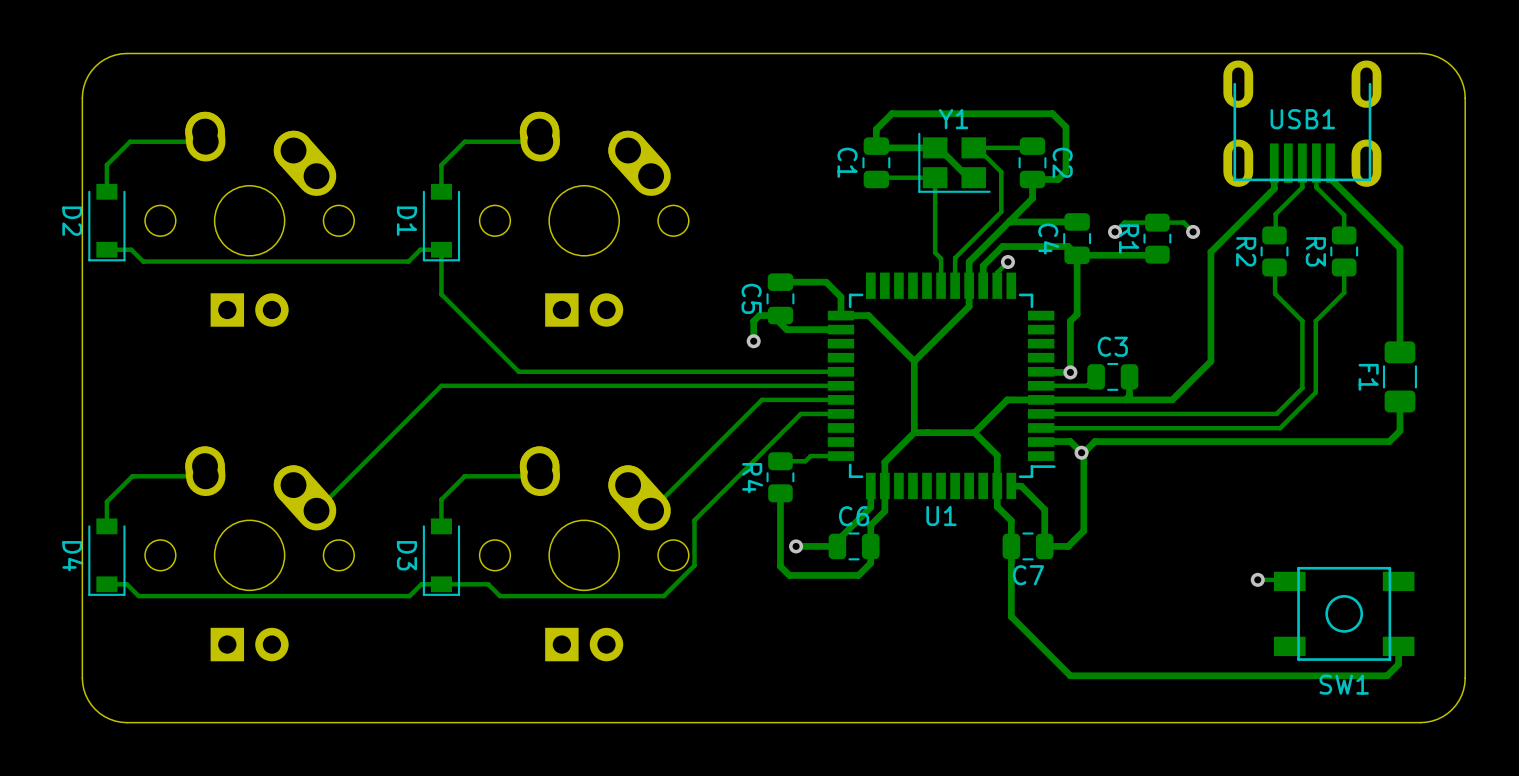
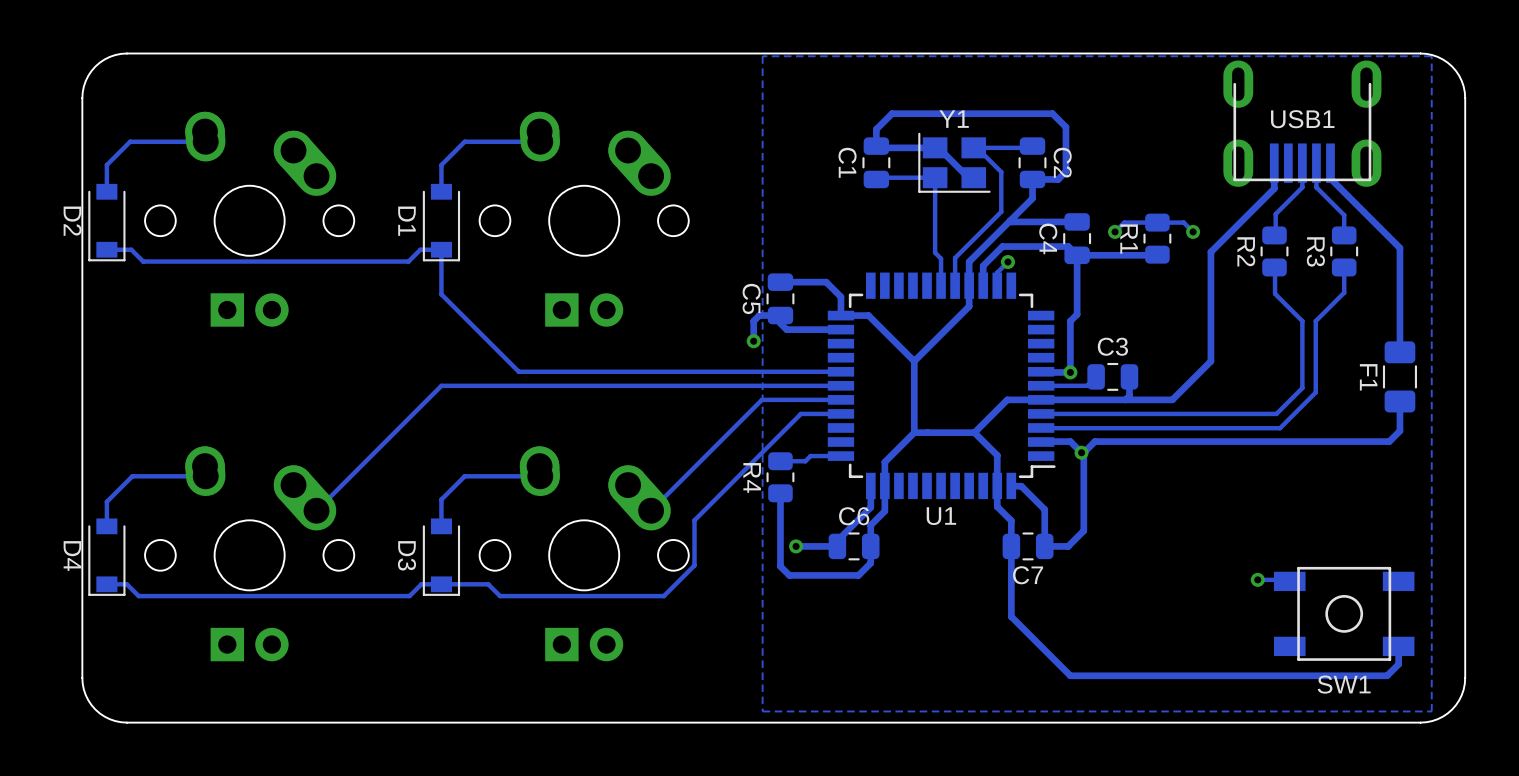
zone outline: none -> (1431, 56) (1431, 711) (762, 711) (762, 56) (1431, 56)

